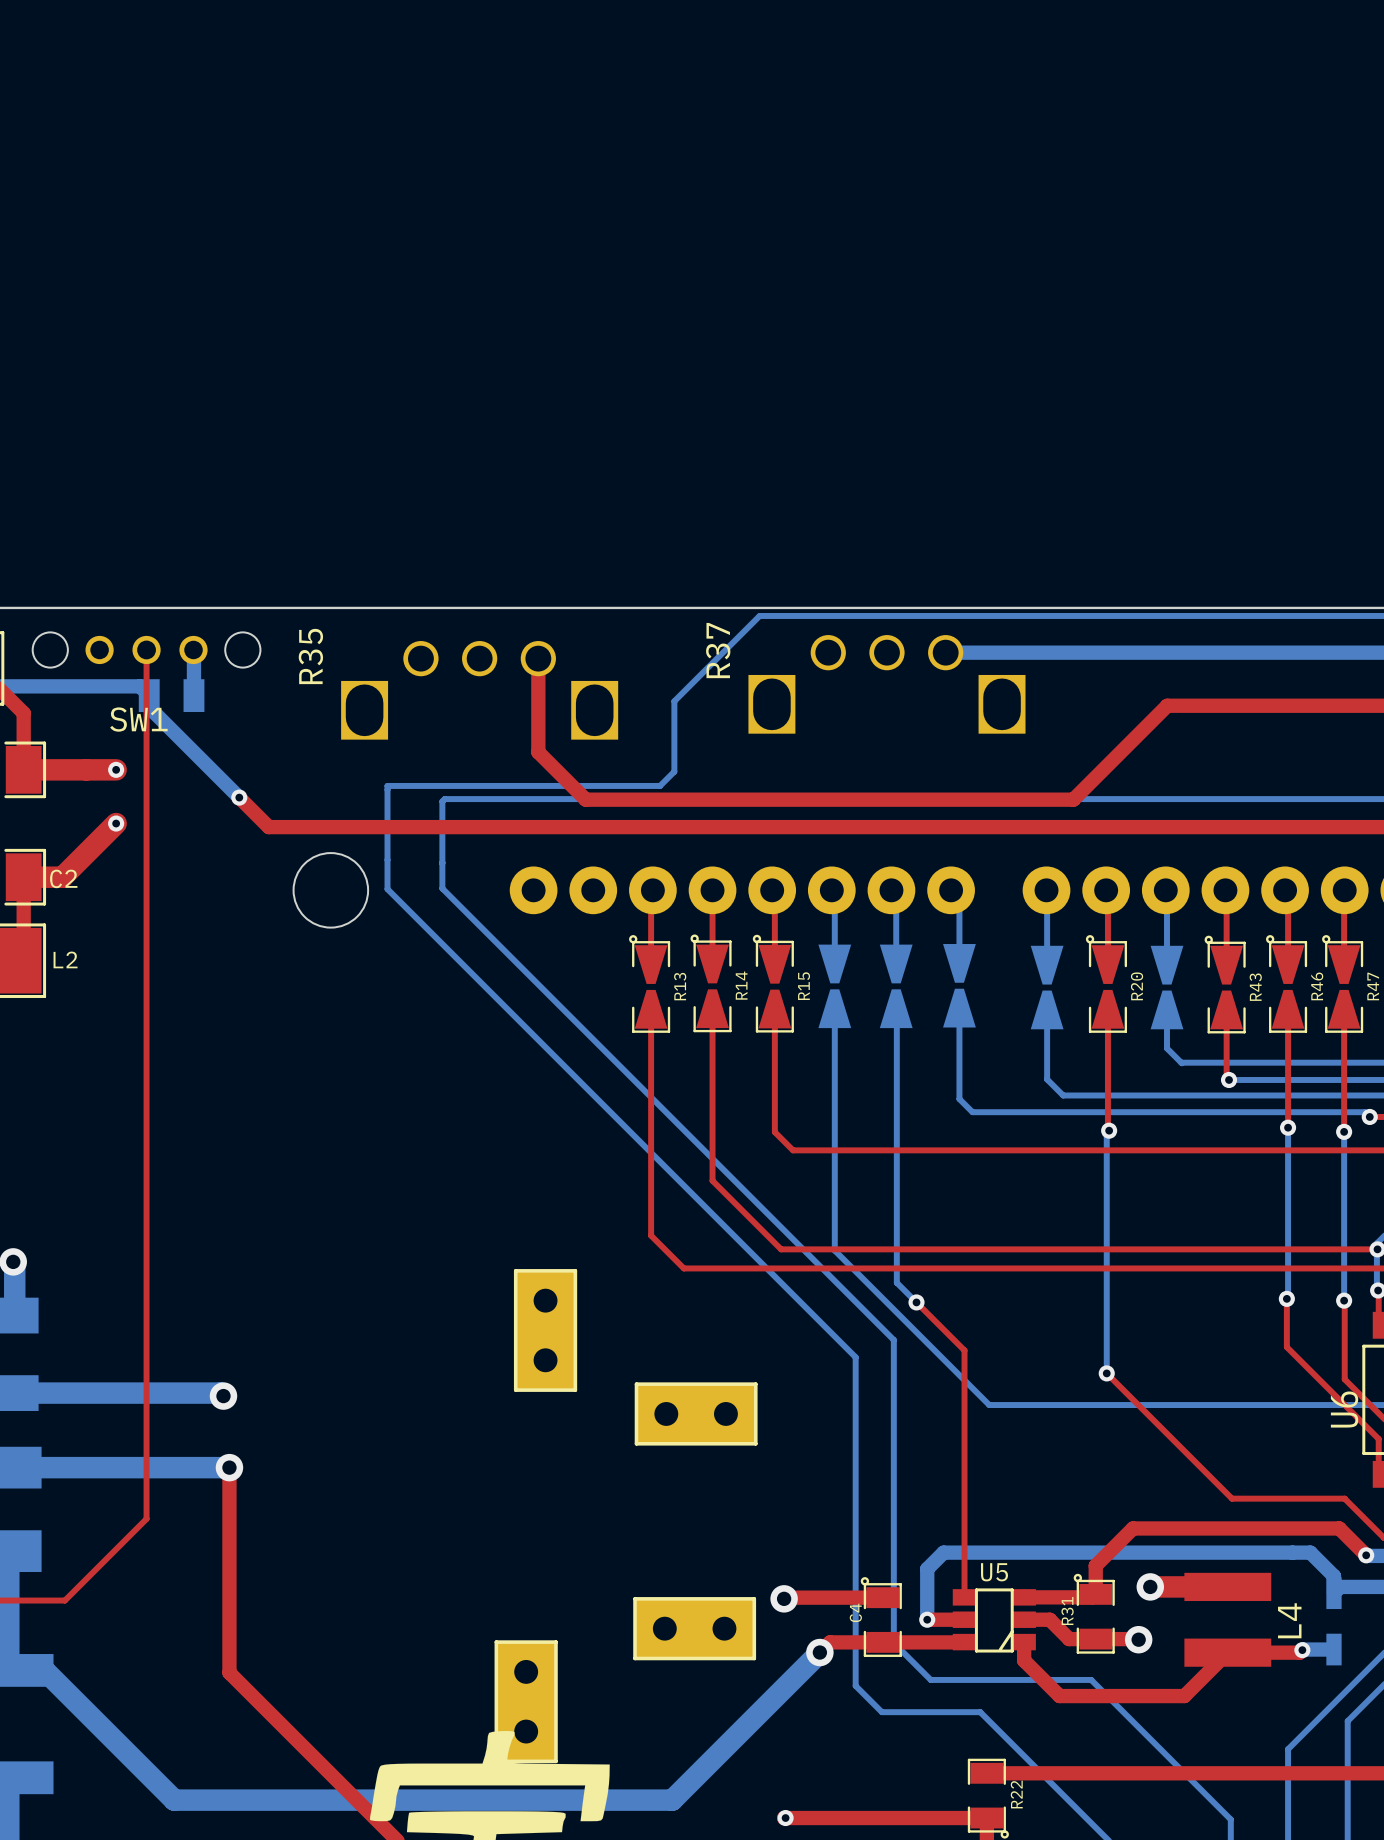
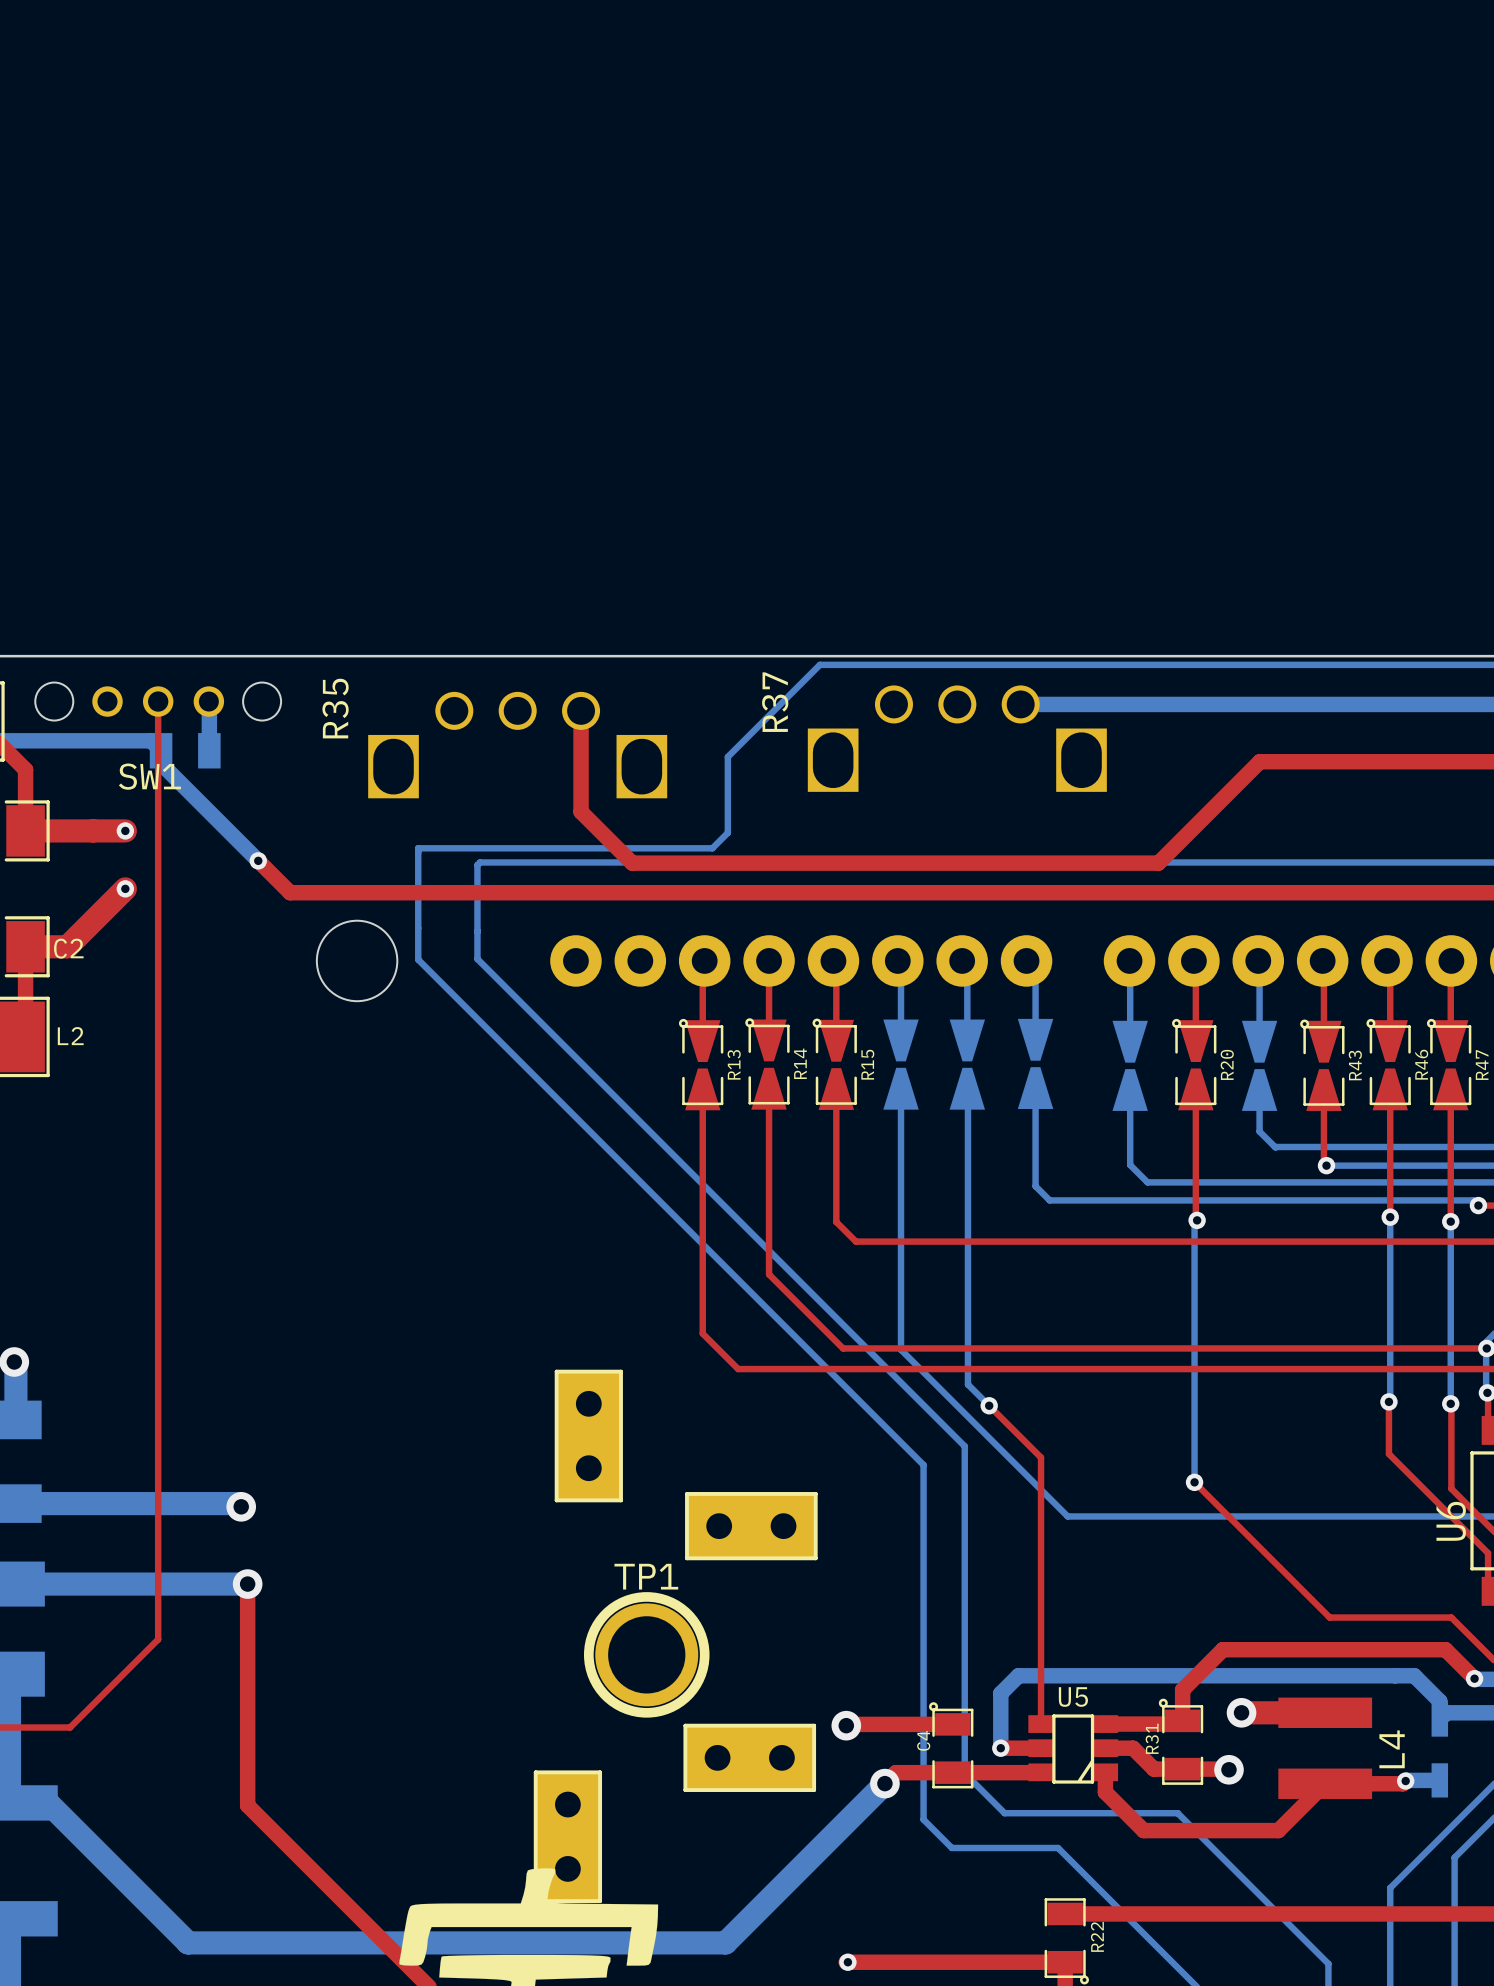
R14 footprint: [690, 934, 732, 1033] -> [745, 1018, 790, 1110]
R15 footprint: [752, 934, 794, 1033] -> [812, 1018, 857, 1110]
R13 footprint: [629, 935, 671, 1033] -> [678, 1018, 724, 1111]
R20 footprint: [1085, 935, 1128, 1033] -> [1172, 1018, 1217, 1111]
R43 footprint: [1204, 935, 1246, 1034] -> [1300, 1019, 1345, 1111]
R46 footprint: [1266, 935, 1308, 1033] -> [1366, 1018, 1411, 1111]
R47 footprint: [1322, 935, 1364, 1033] -> [1426, 1018, 1472, 1111]
TP1: none -> (646, 1654)

